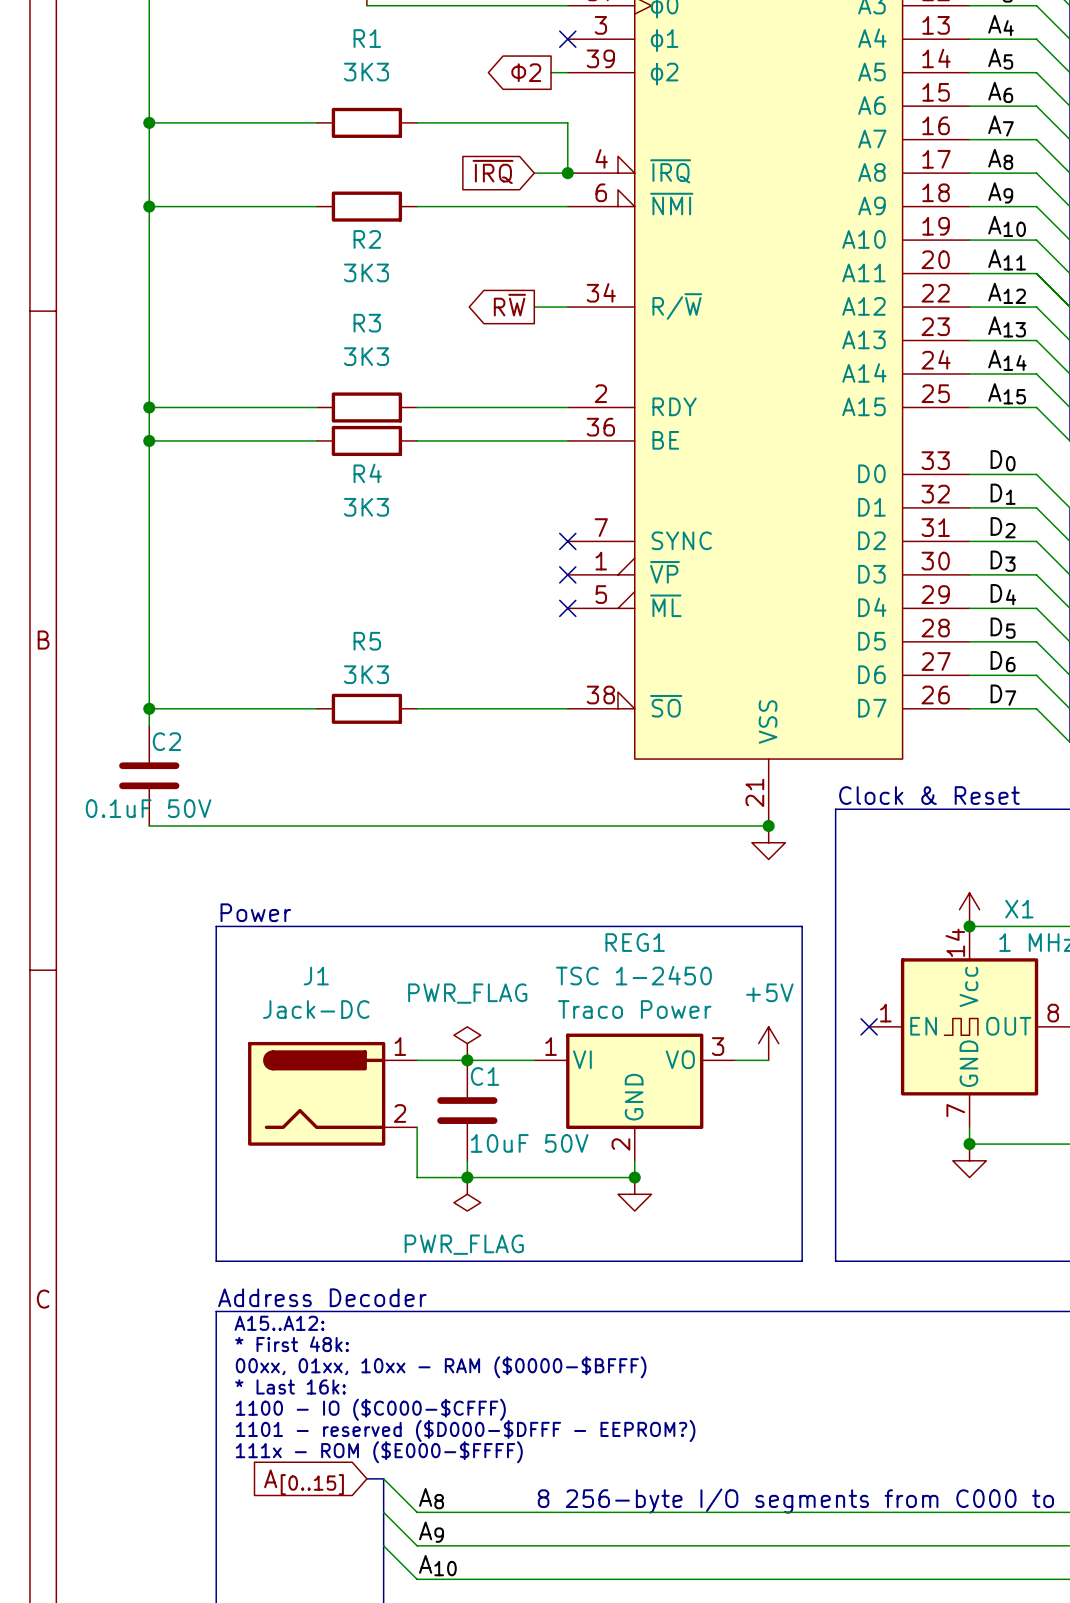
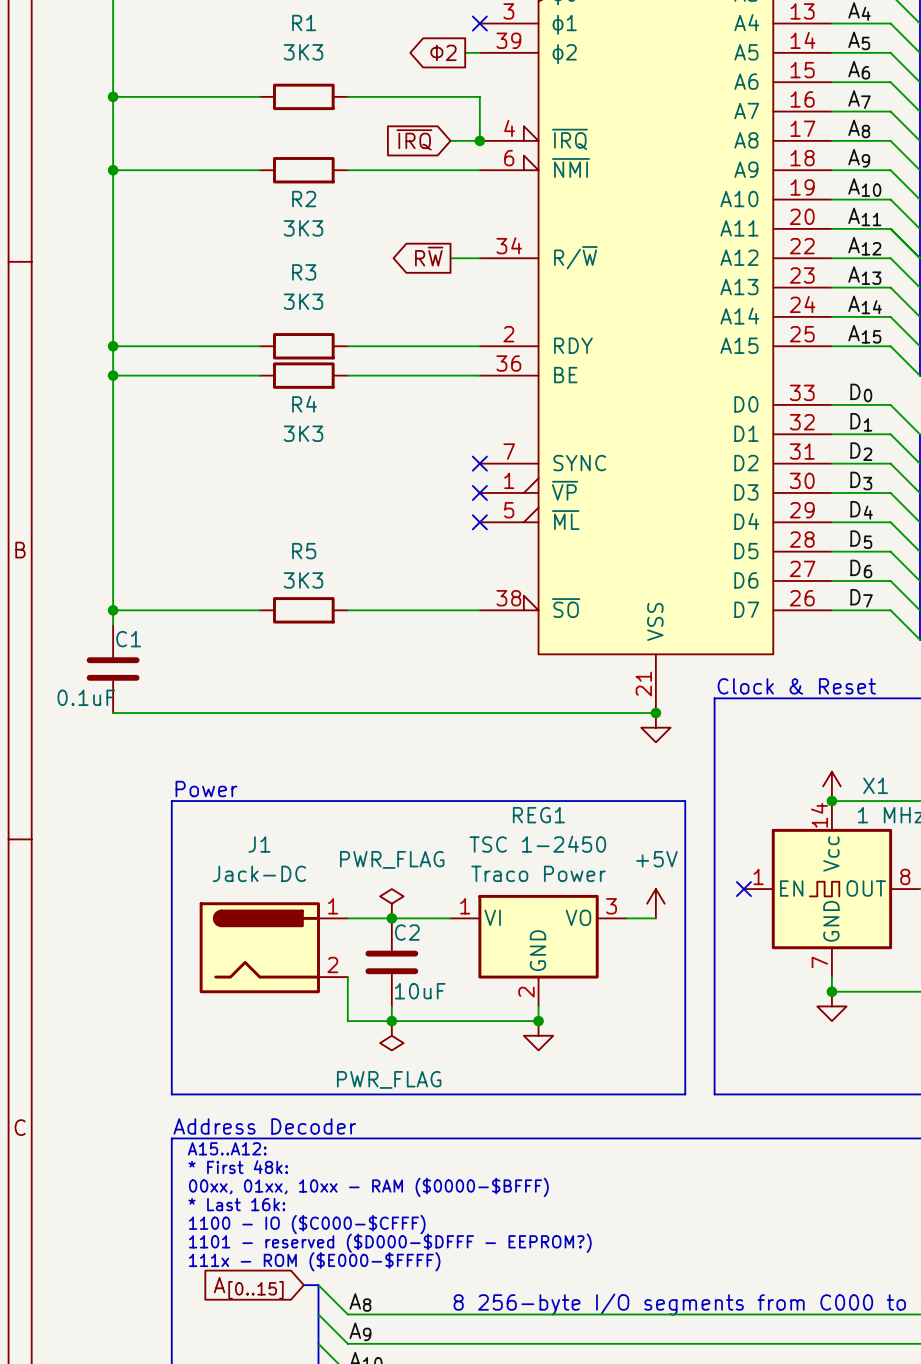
C2 name: C2 (166, 741) -> C1 (128, 639)
C2 value: 0.1uF 50V (148, 808) -> 0.1uF (86, 697)
C1 name: C1 (485, 1076) -> C2 (407, 932)
C1 value: 10uF 50V (529, 1143) -> 10uF (420, 991)

